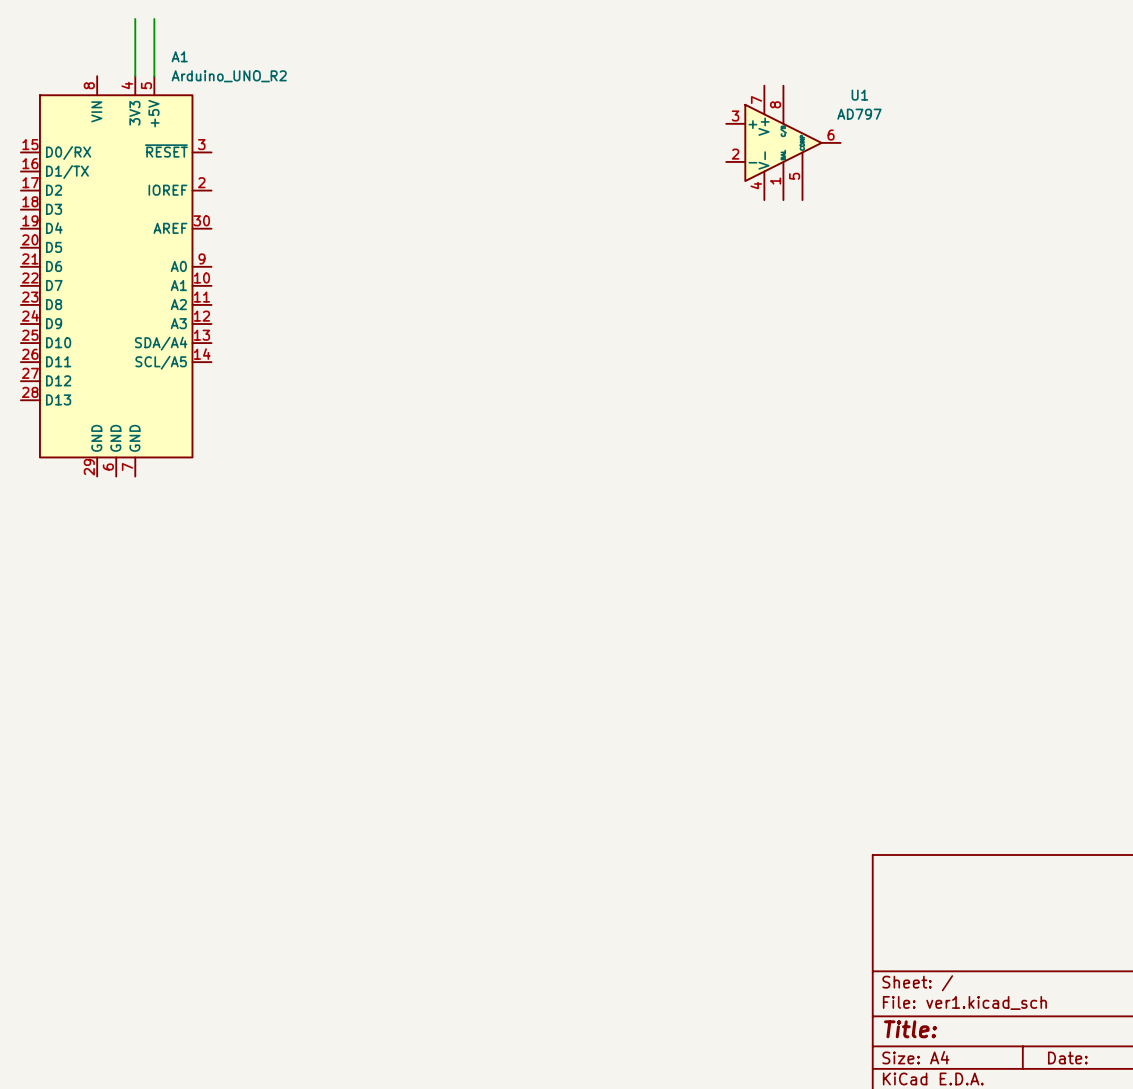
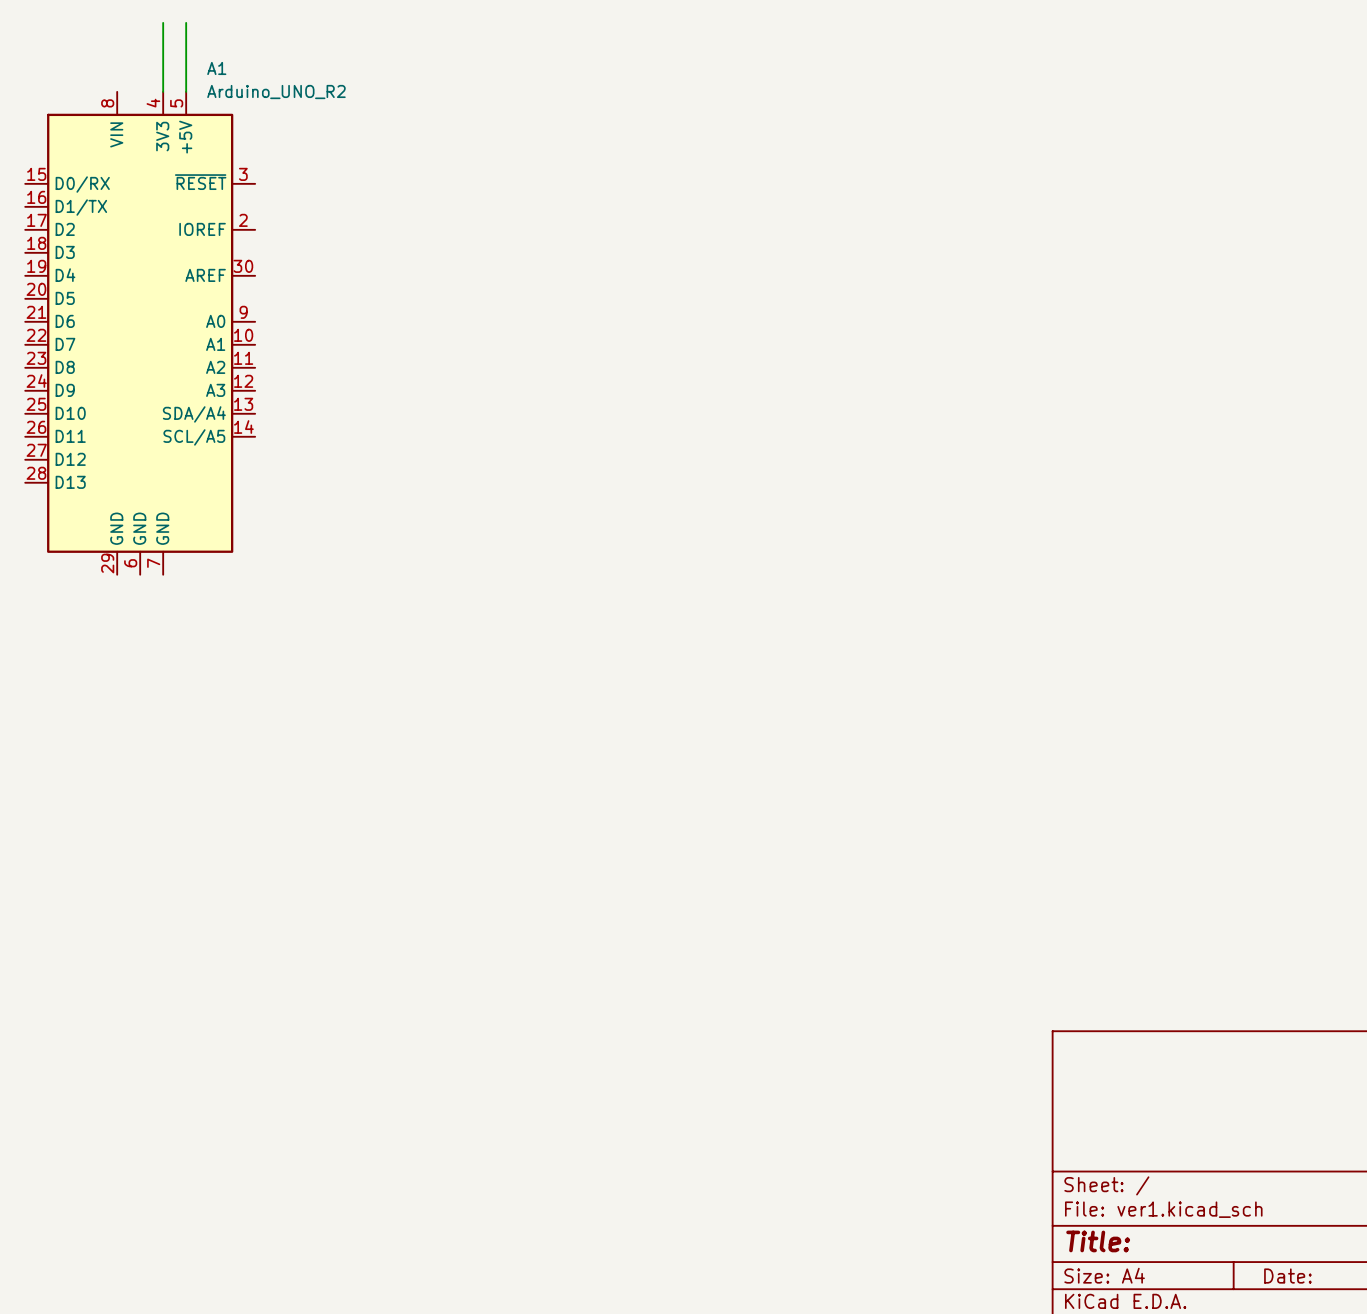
U1: AD797 (783, 142) -> none

